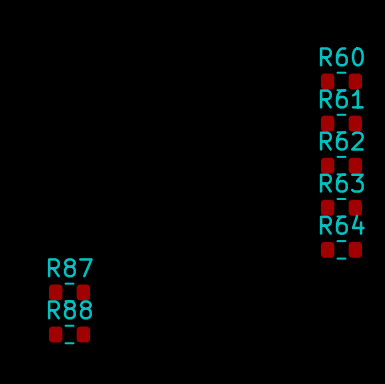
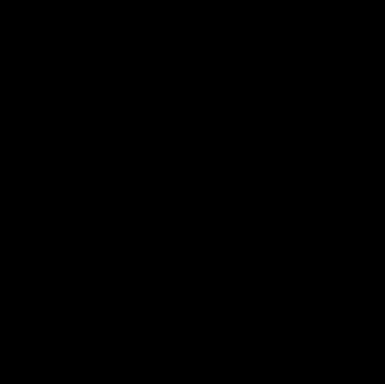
R60: (341, 81) -> none
R61: (341, 123) -> none
R62: (341, 165) -> none
R63: (341, 207) -> none
R64: (341, 249) -> none
R87: (69, 292) -> none
R88: (69, 334) -> none

